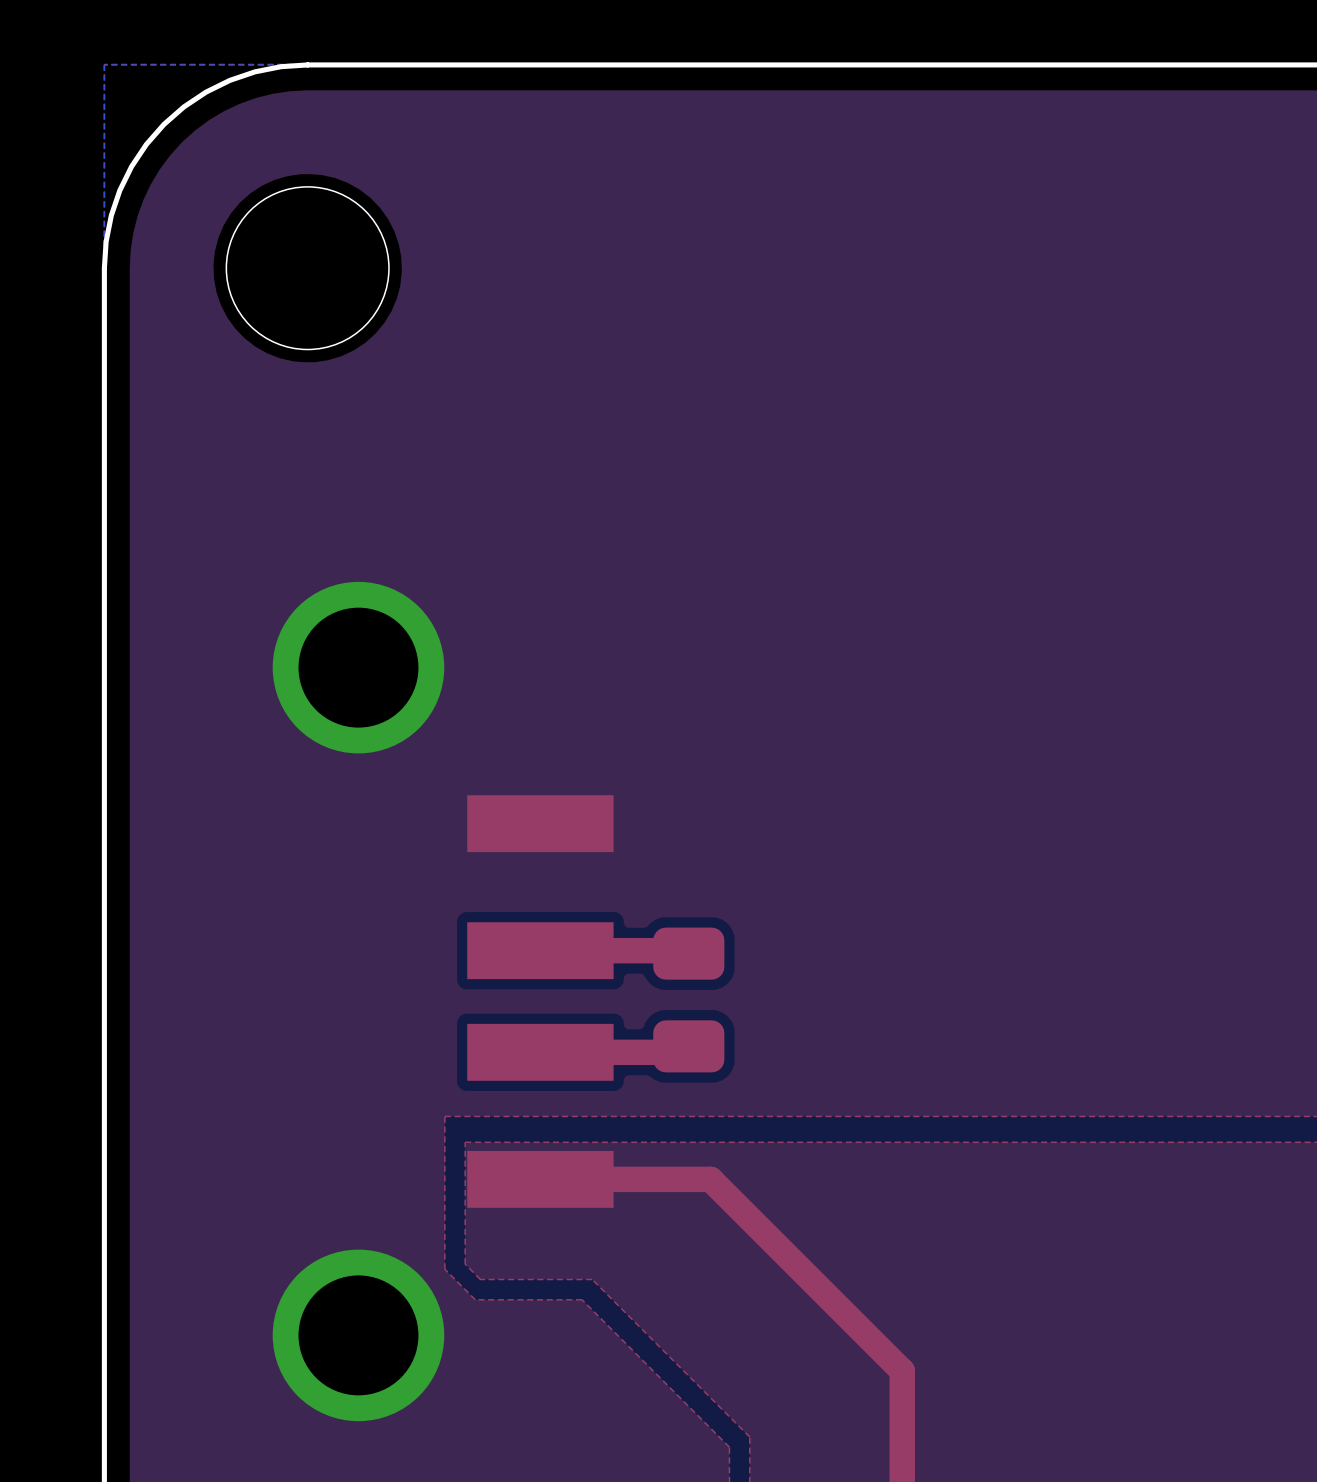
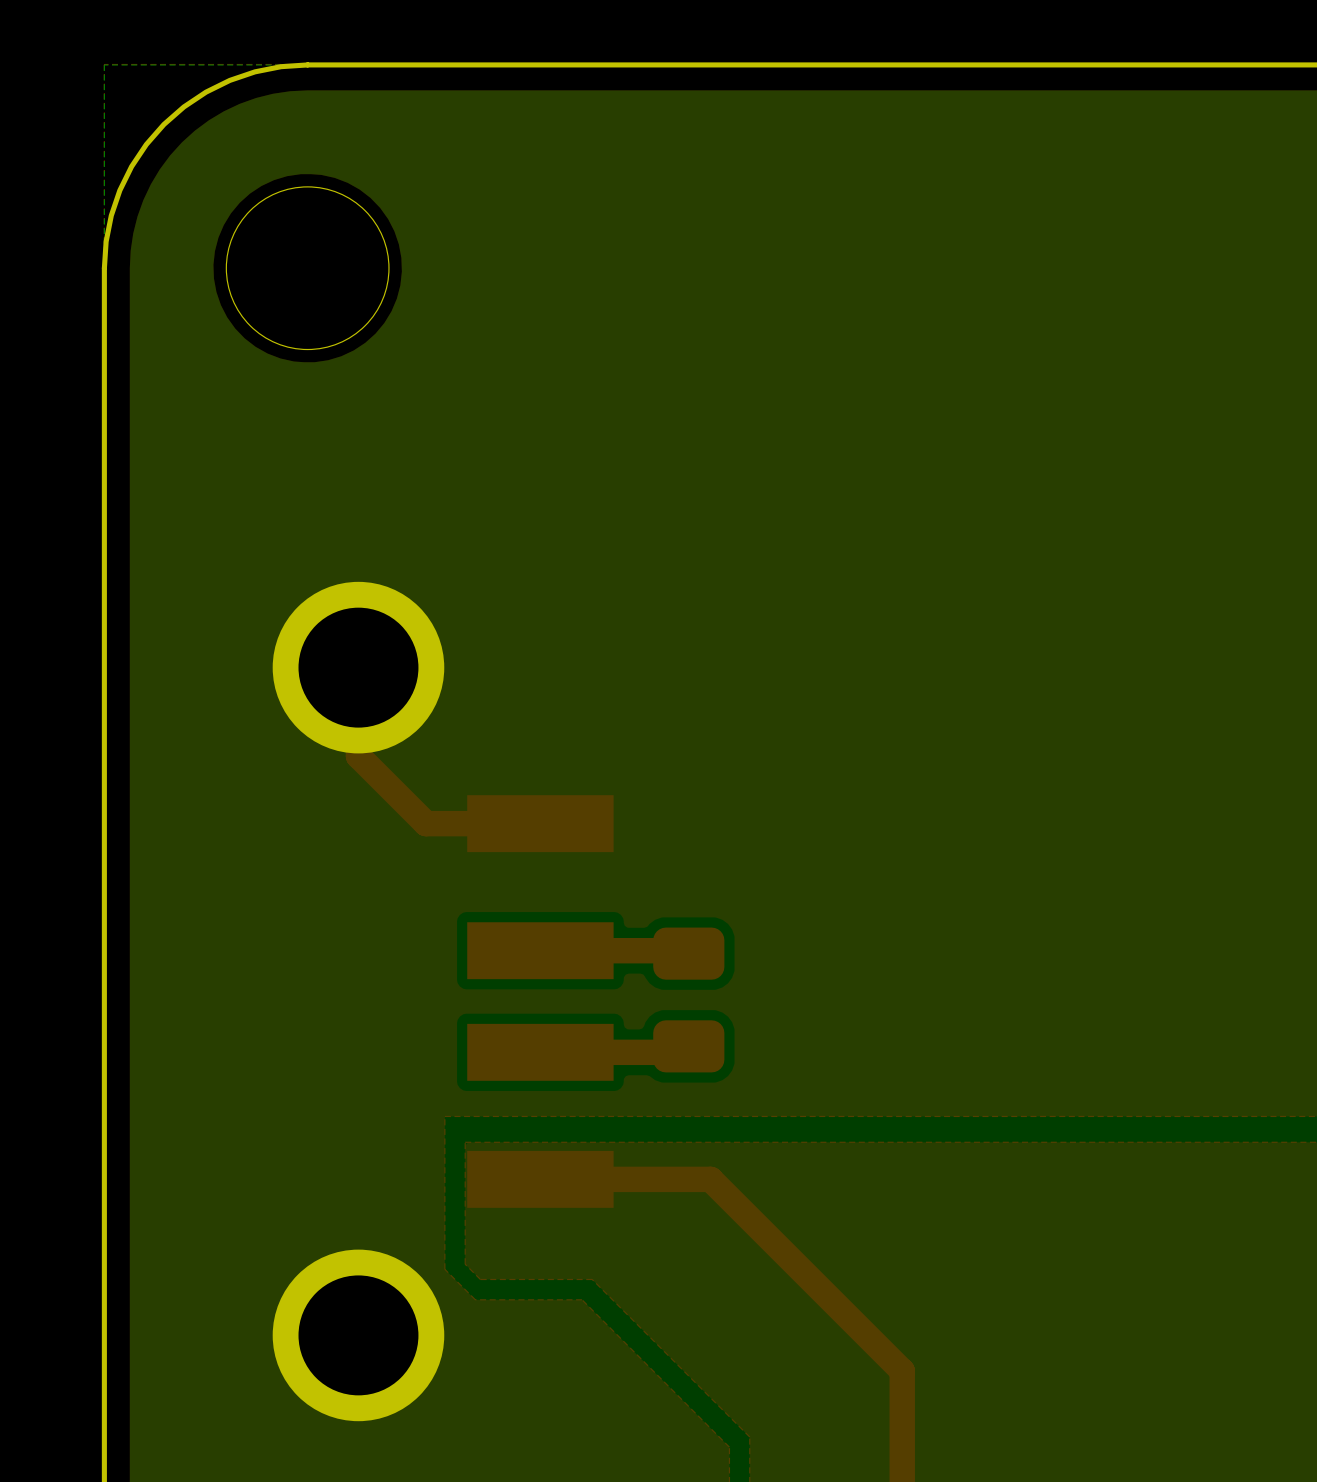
top track: none -> (358, 667) (358, 756) (426, 823) (540, 823)

